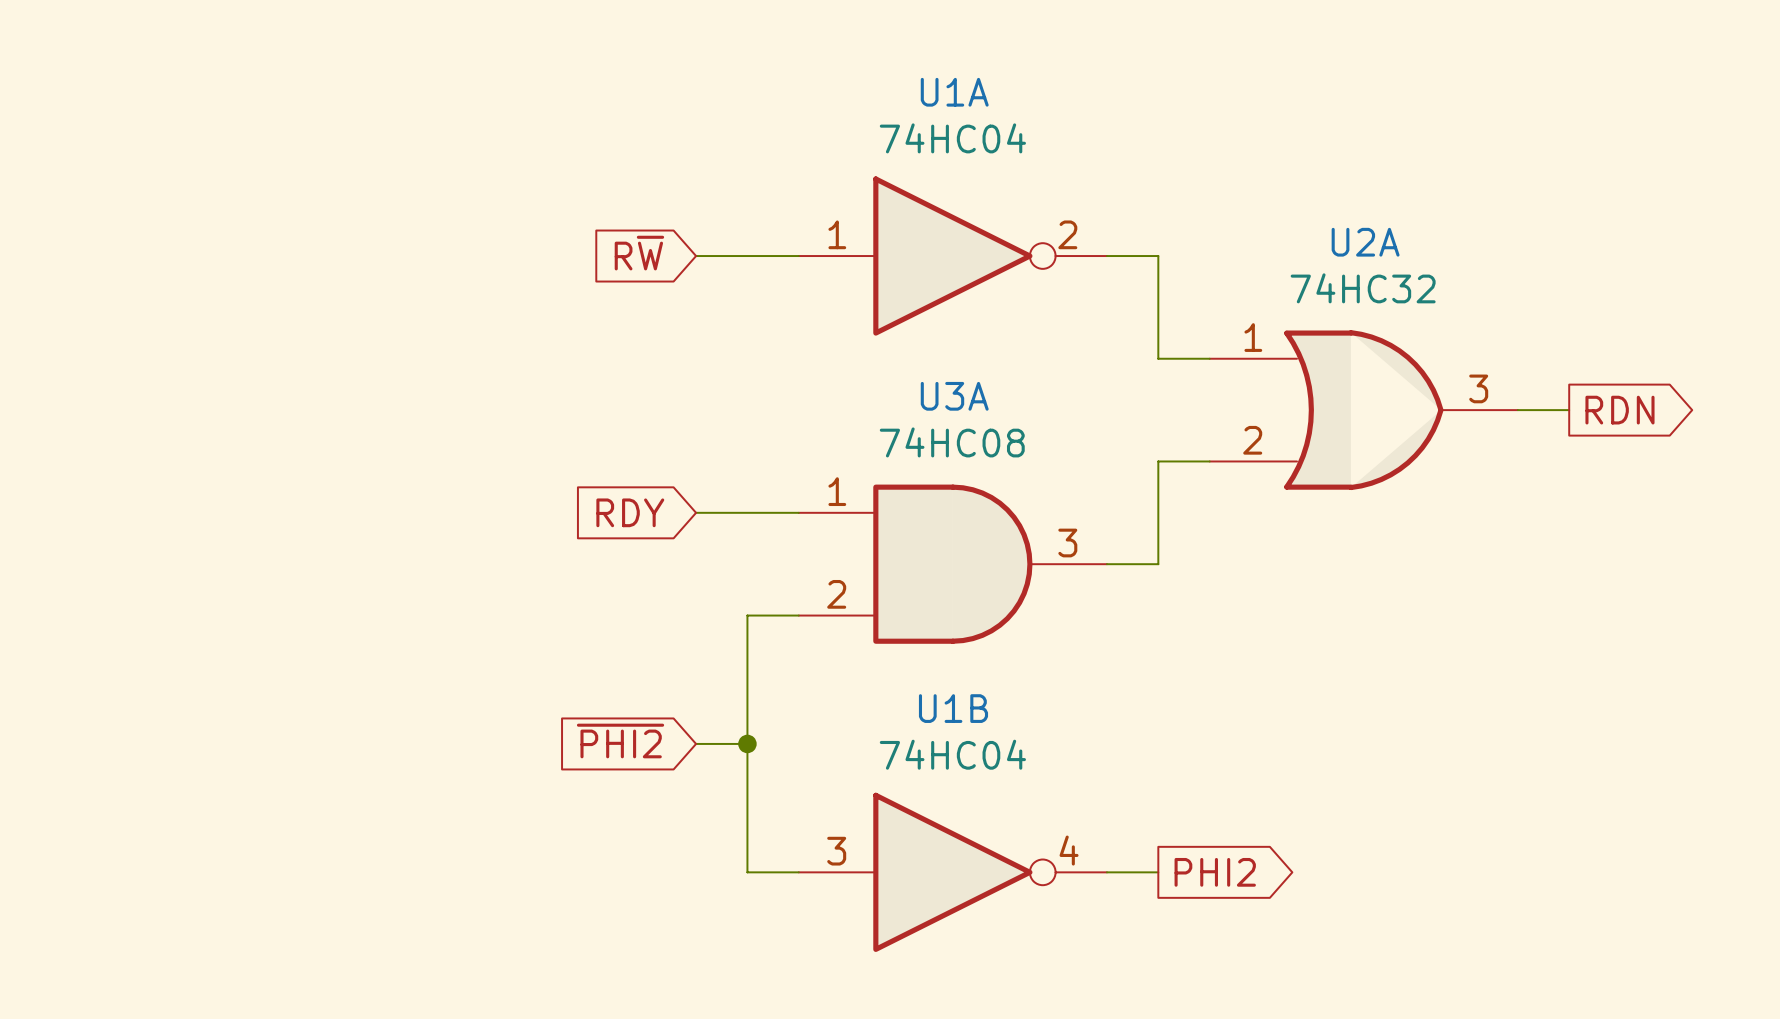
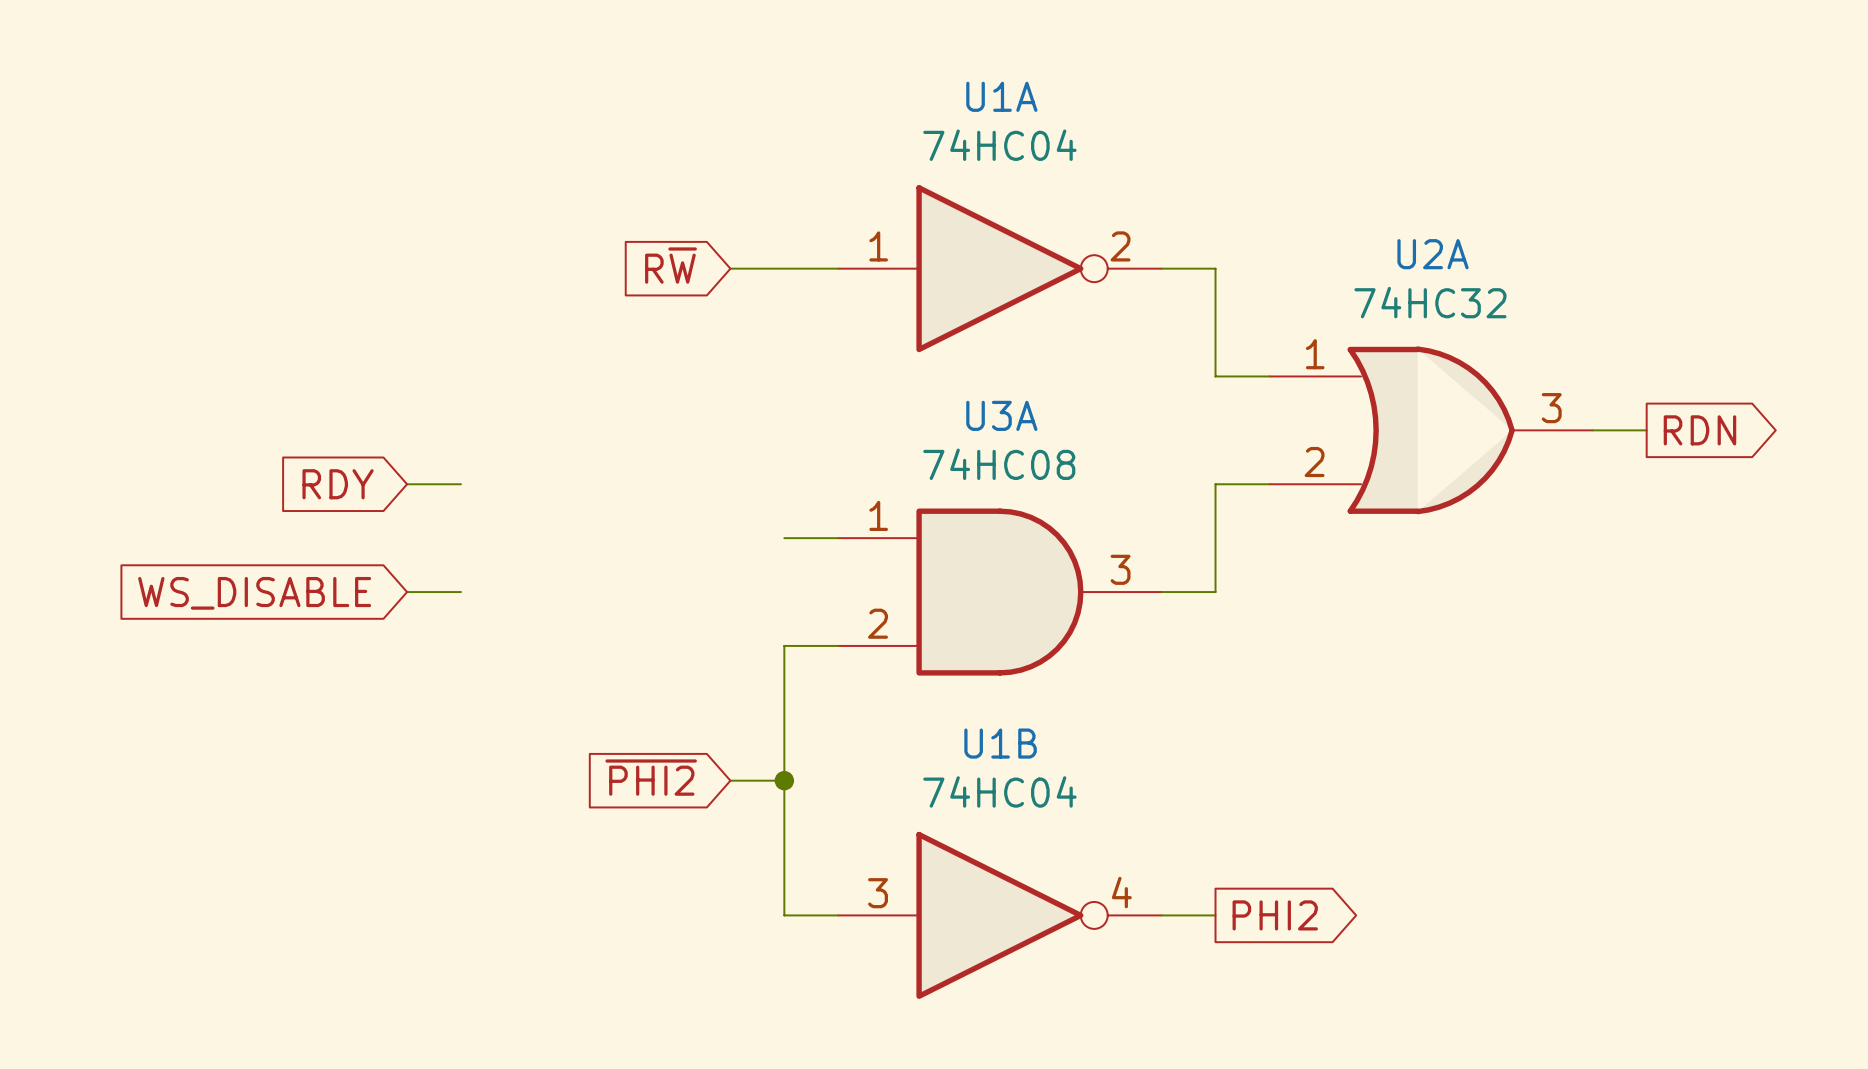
global label position: RDY (630, 512) -> RDY (338, 484)
wire: (696, 512) (747, 512) -> (407, 484) (460, 484)
wire: none -> (407, 592) (460, 592)
global label: none -> WS_DISABLE (254, 593)

